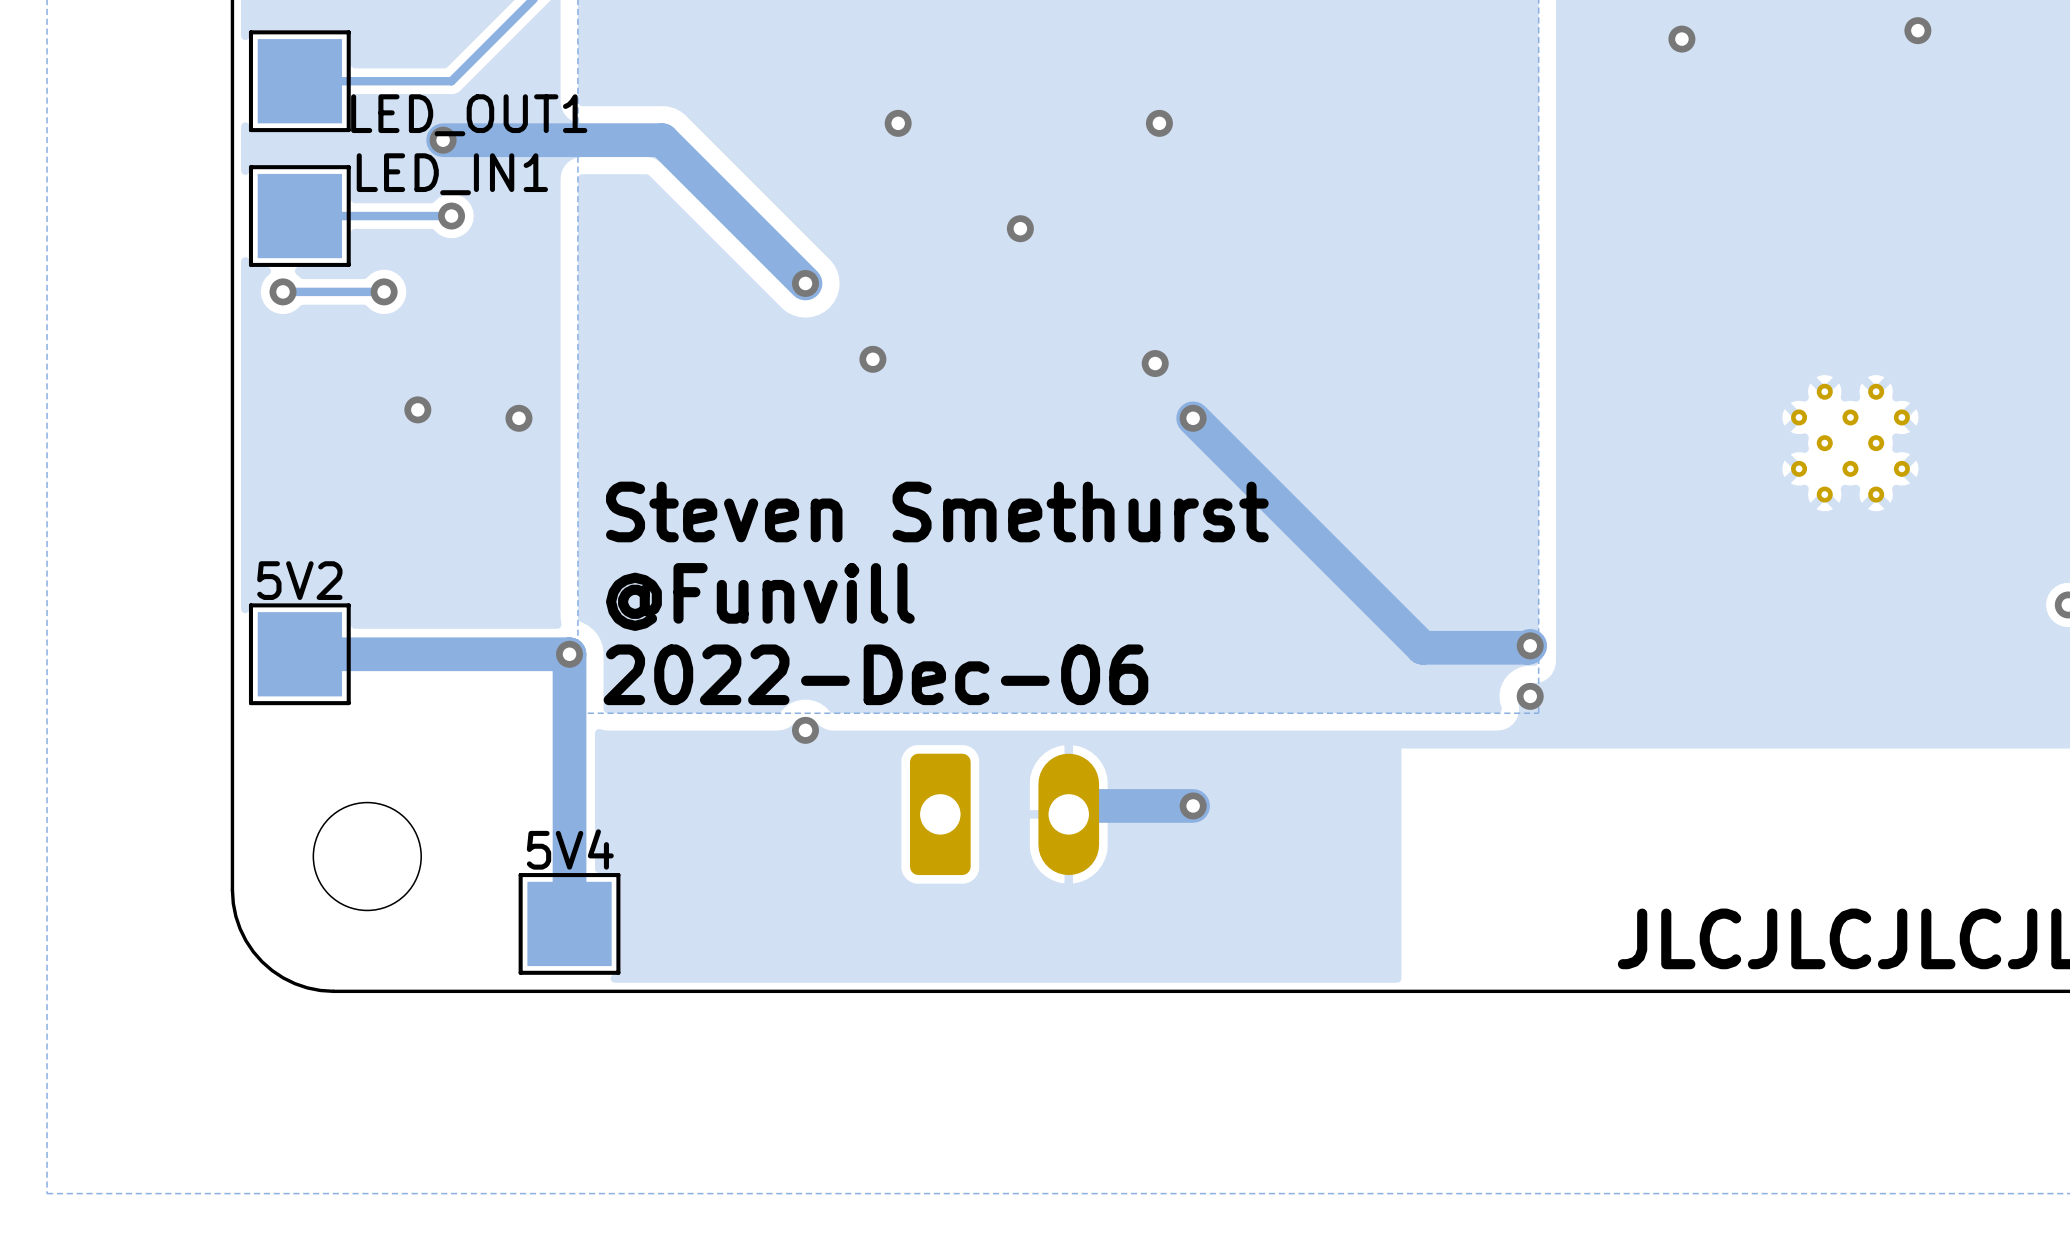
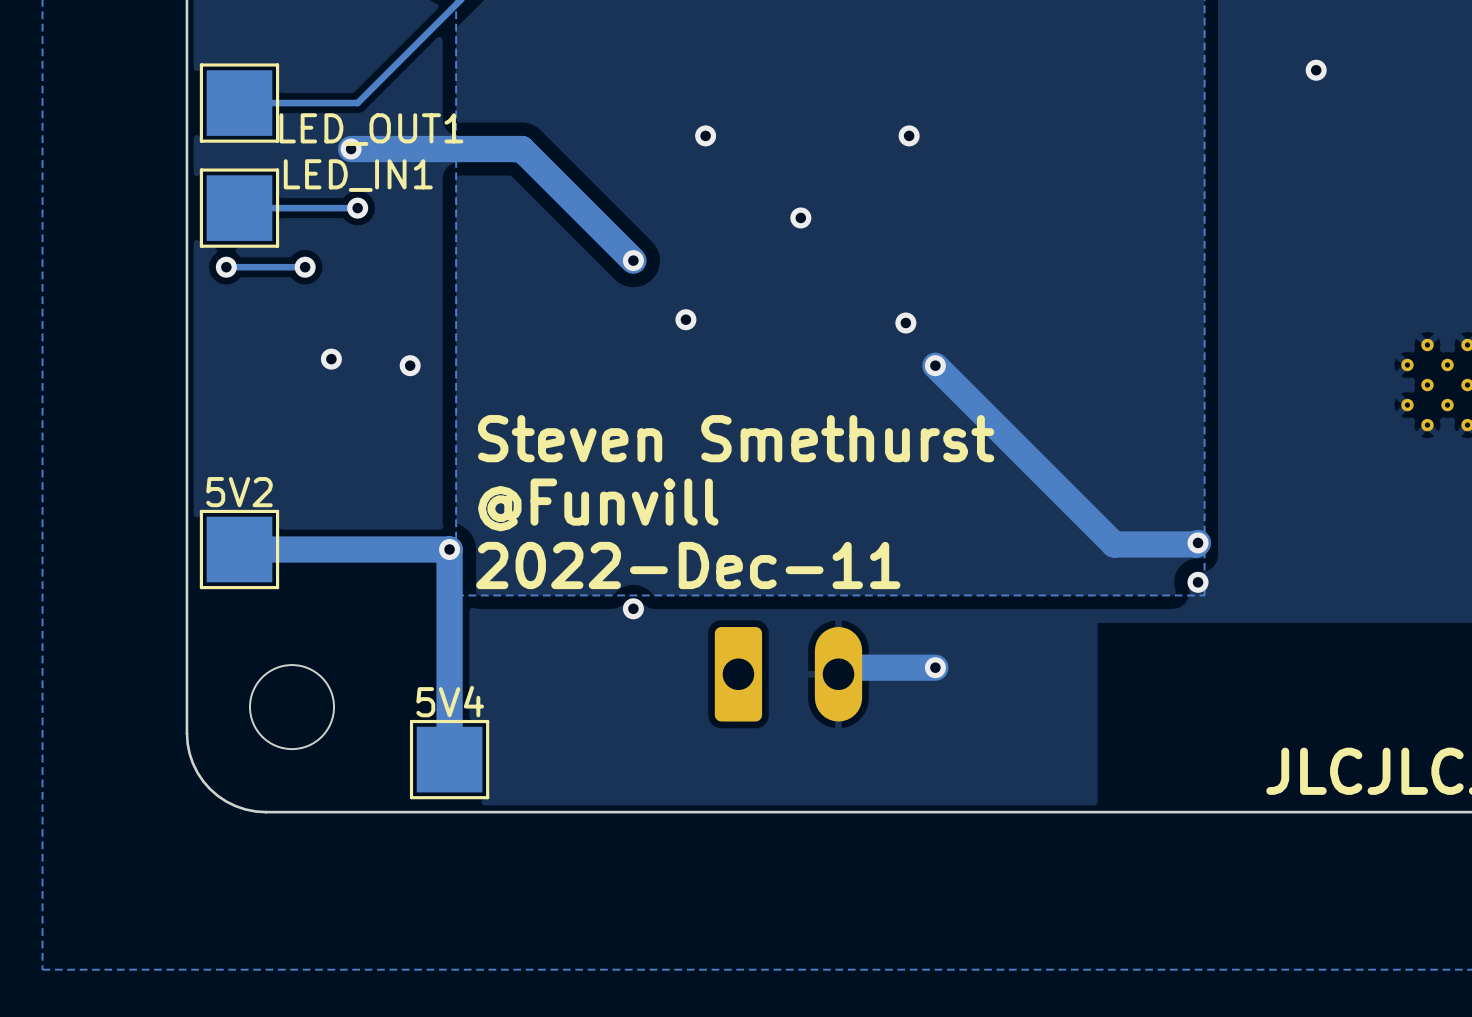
text: 2022-Dec-06 (875, 674) -> 2022-Dec-11 (688, 565)

